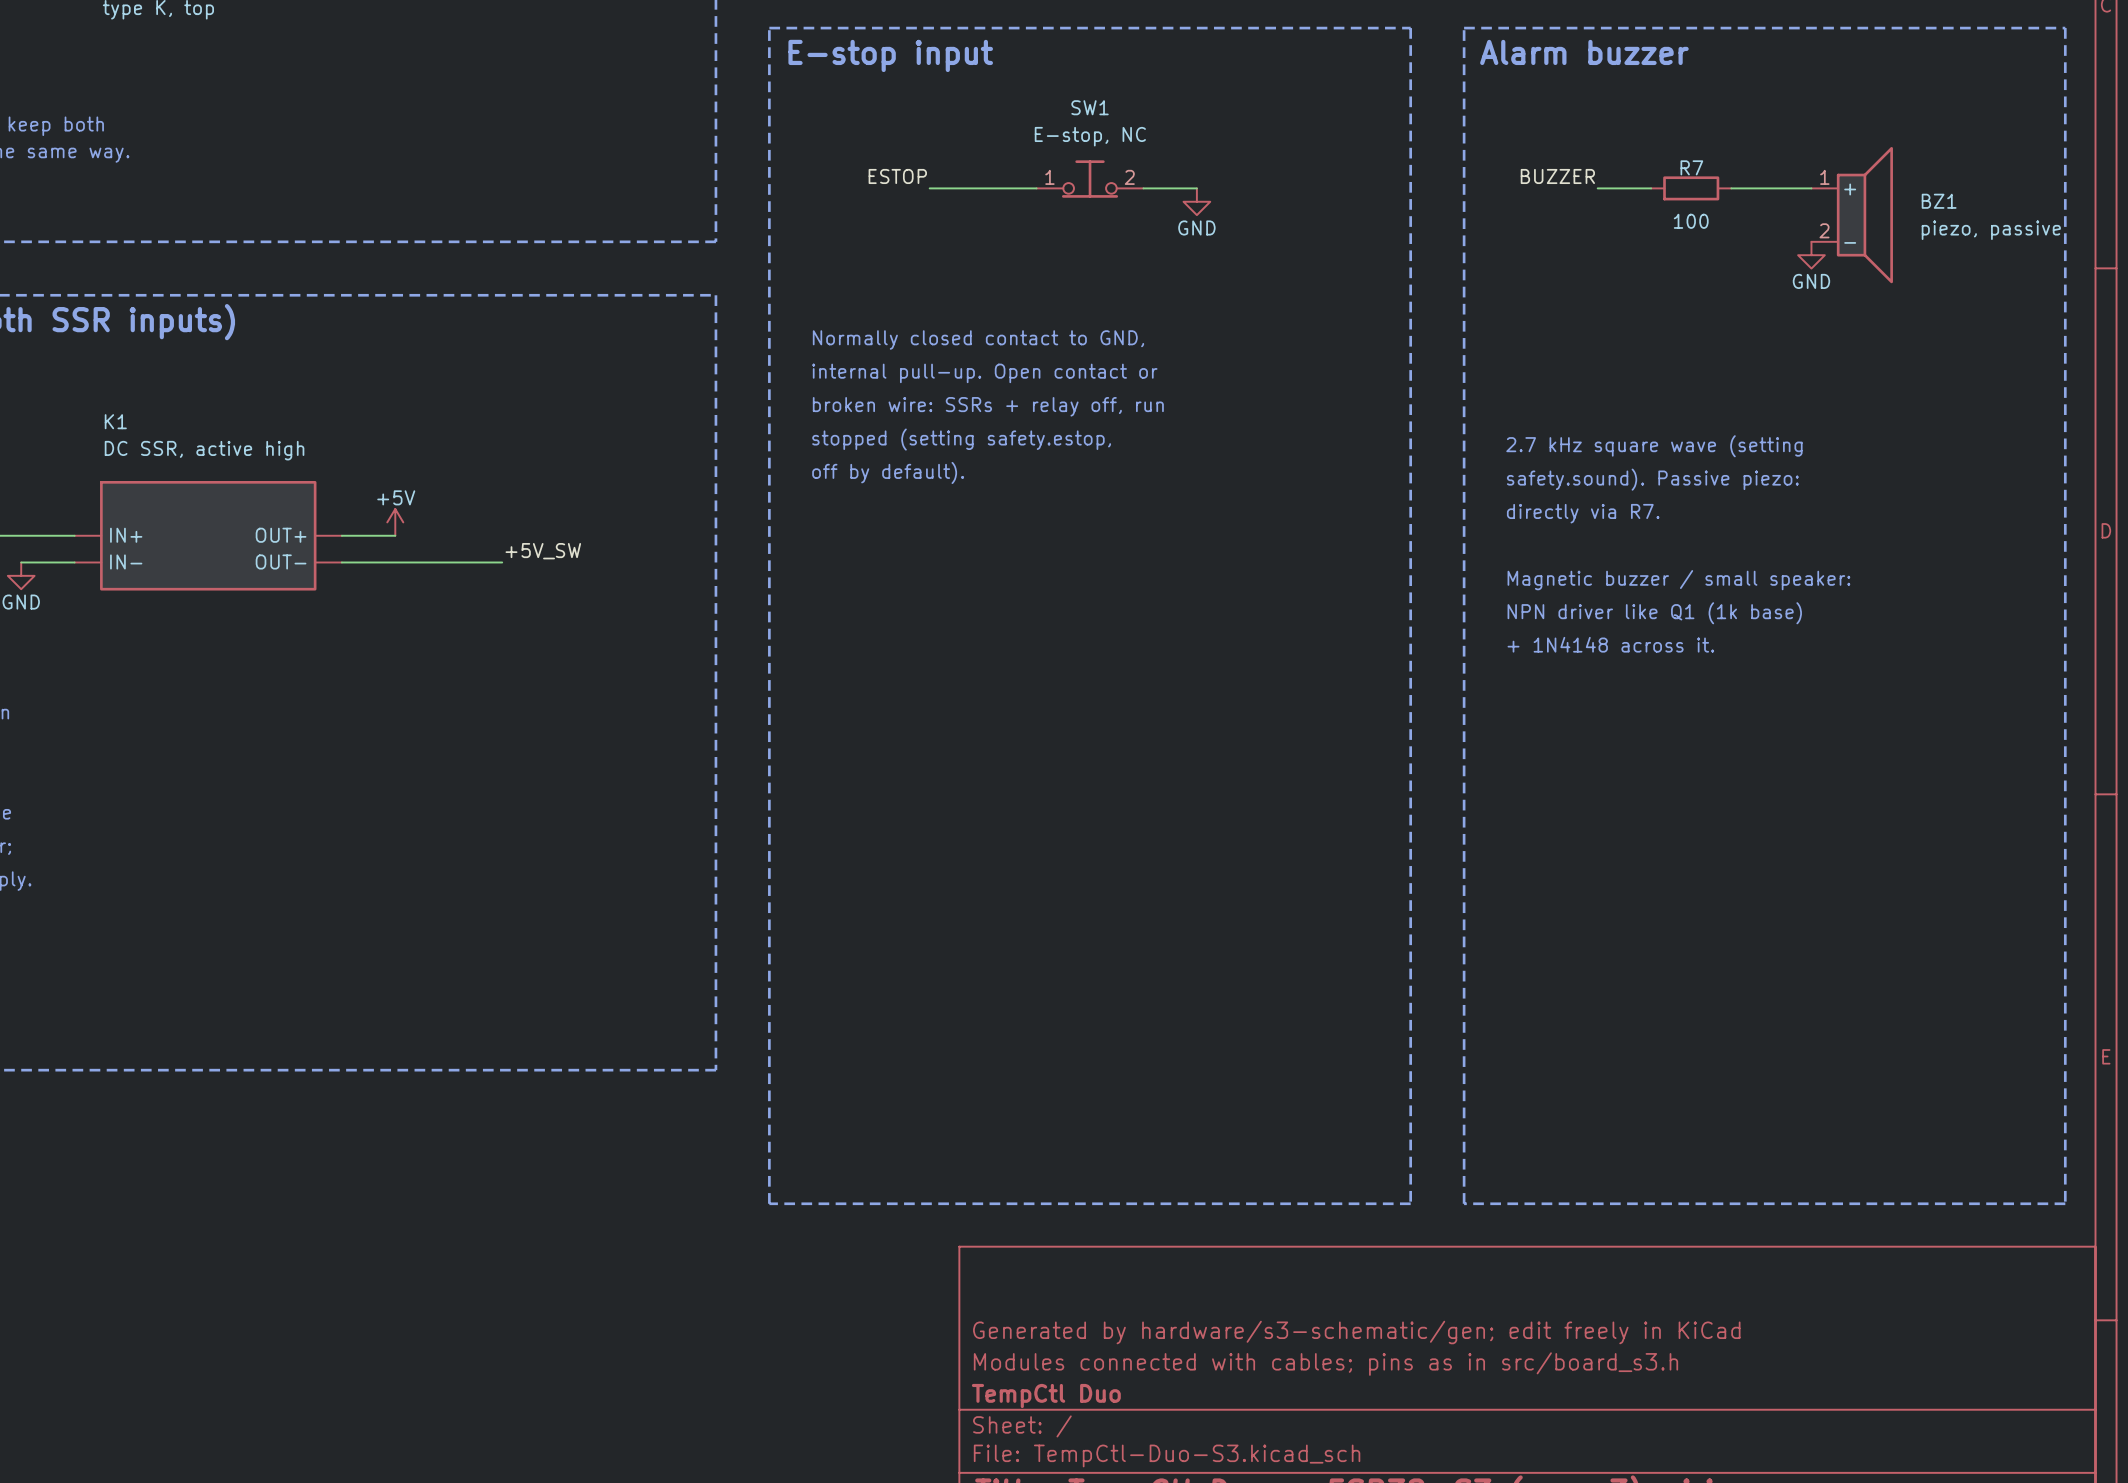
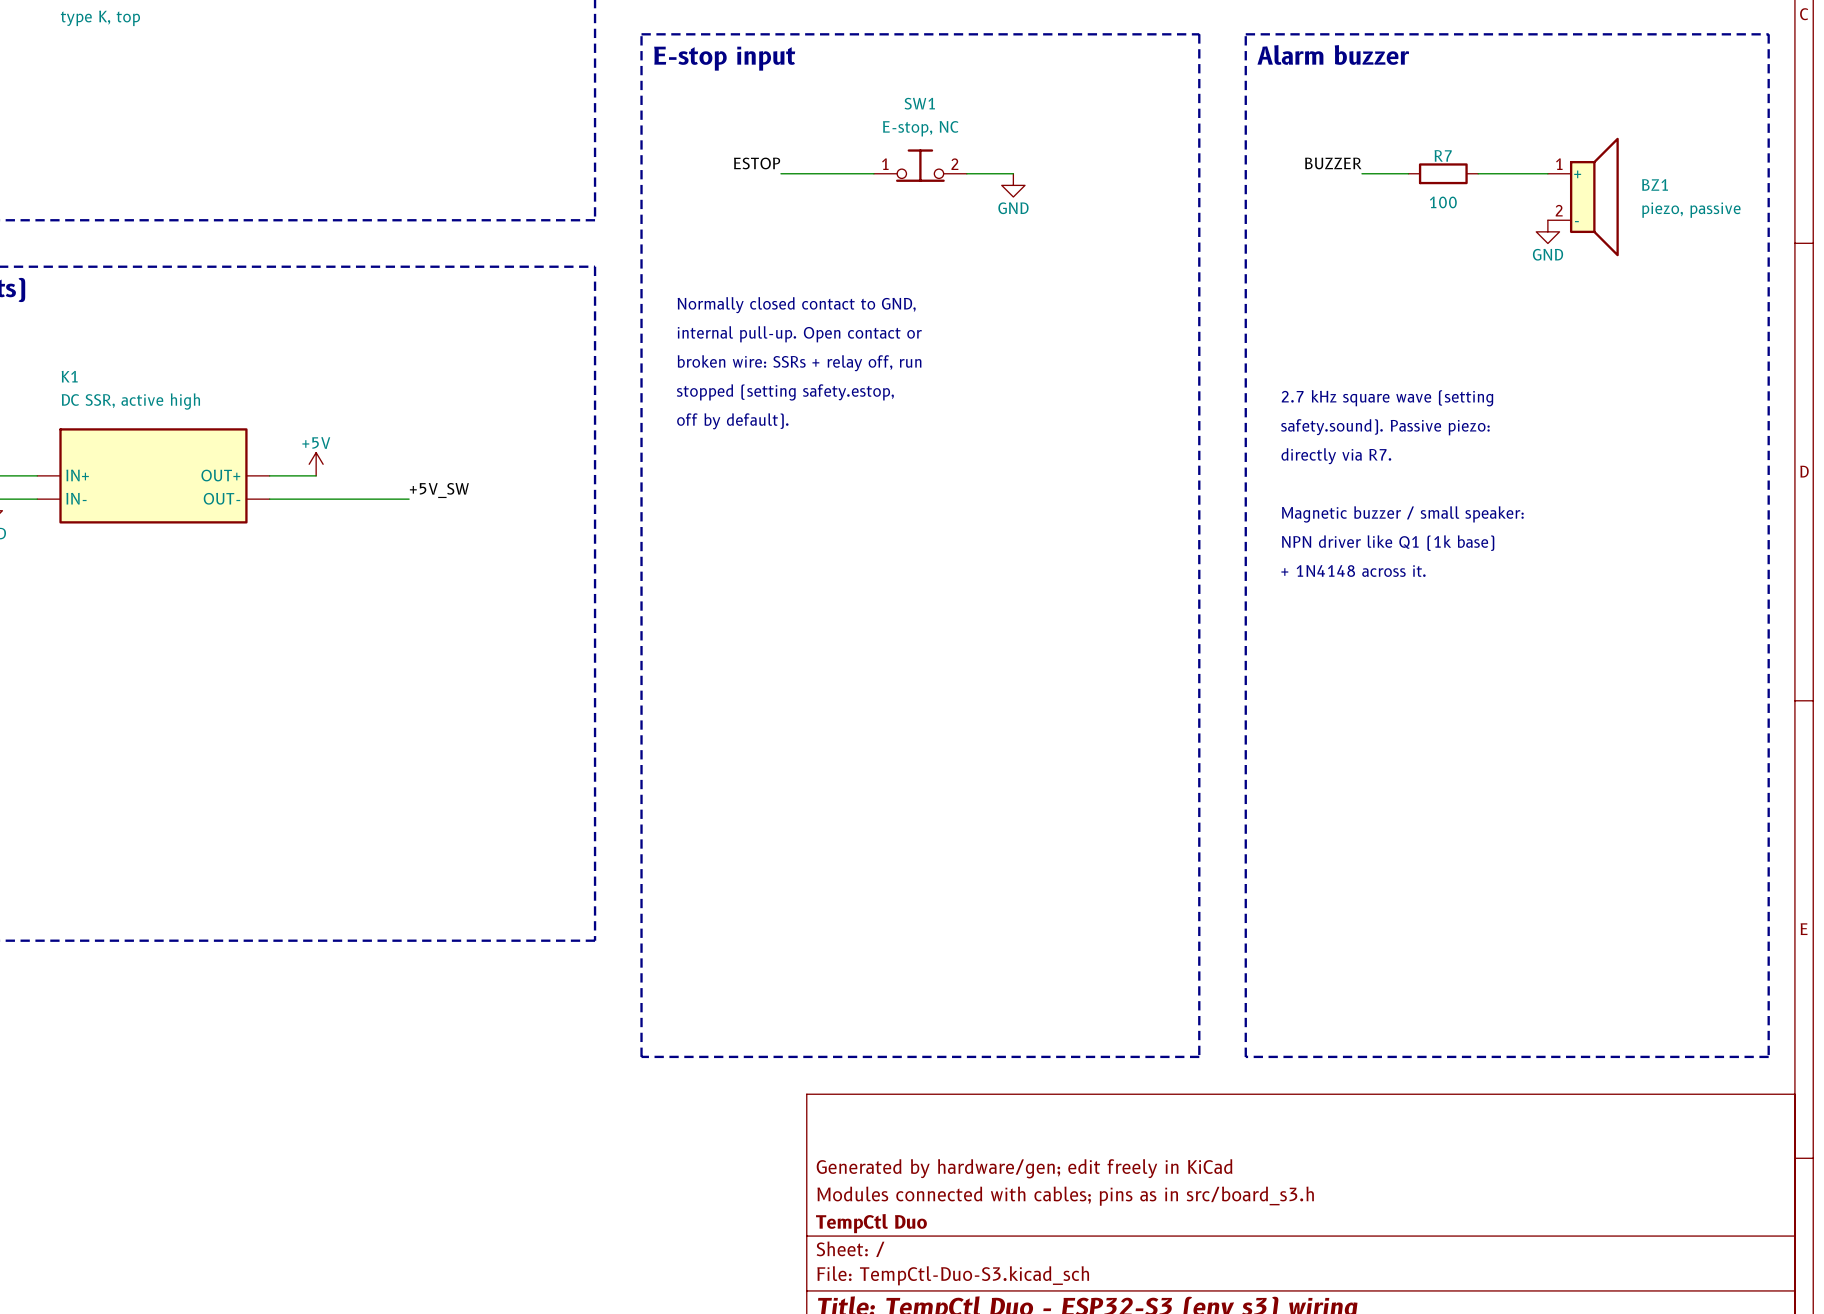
title block: Generated by hardware/s3-schematic/gen; edit freely in KiCad (1356, 1332) -> Generated by hardware/gen; edit freely in KiCad (1024, 1168)

